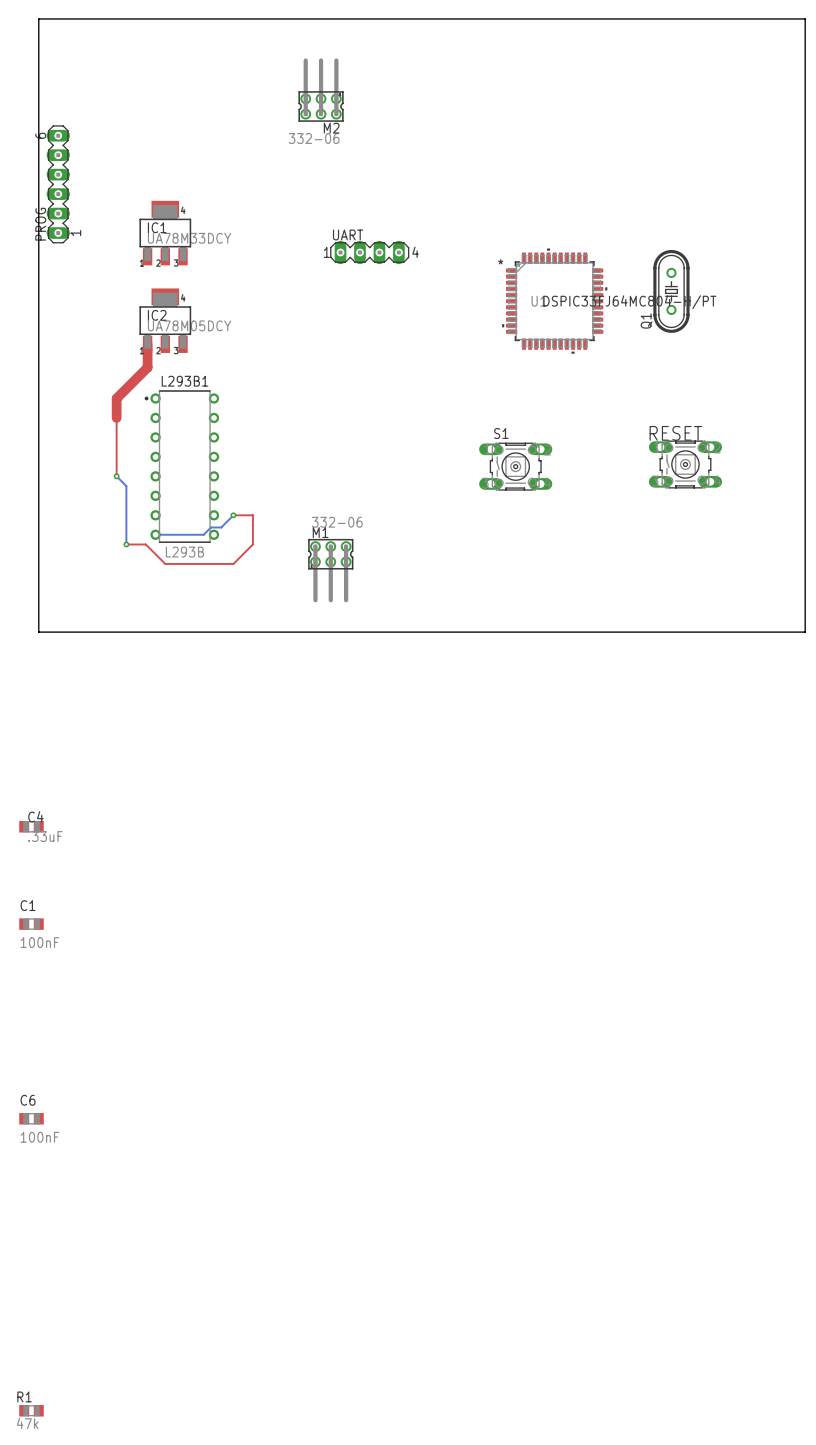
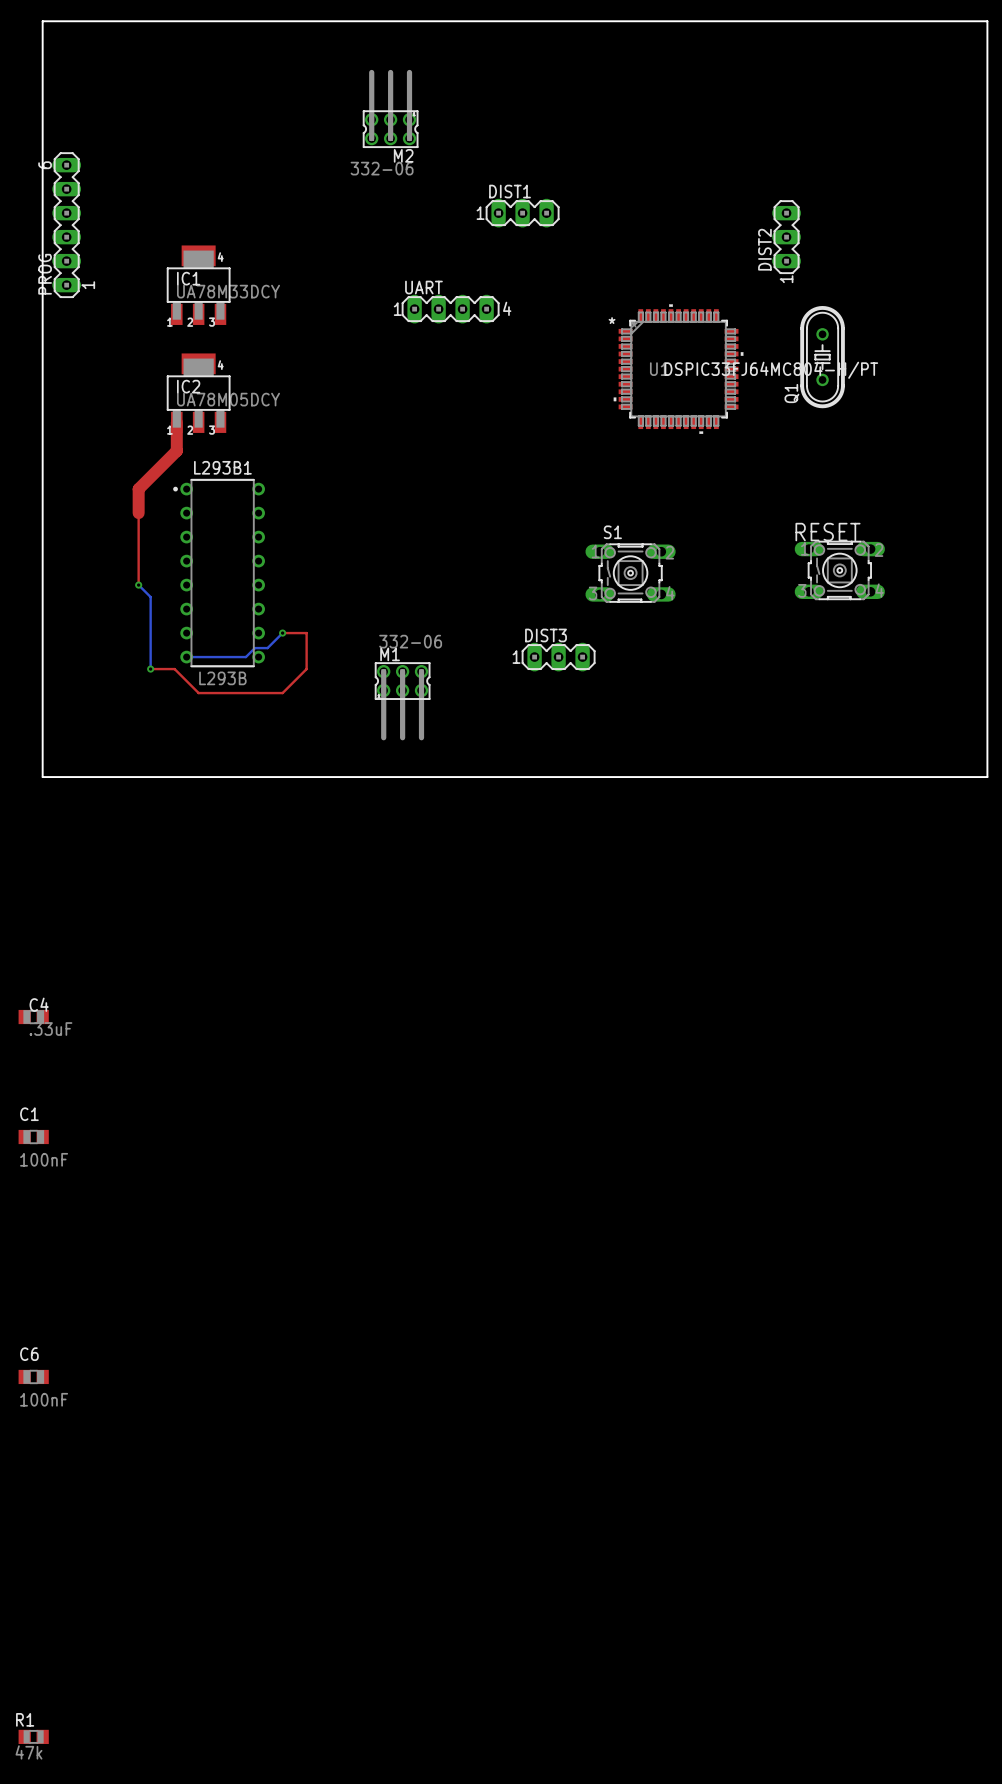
DIST1: none -> (522, 213)
DIST2: none -> (786, 237)
DIST3: none -> (558, 657)

